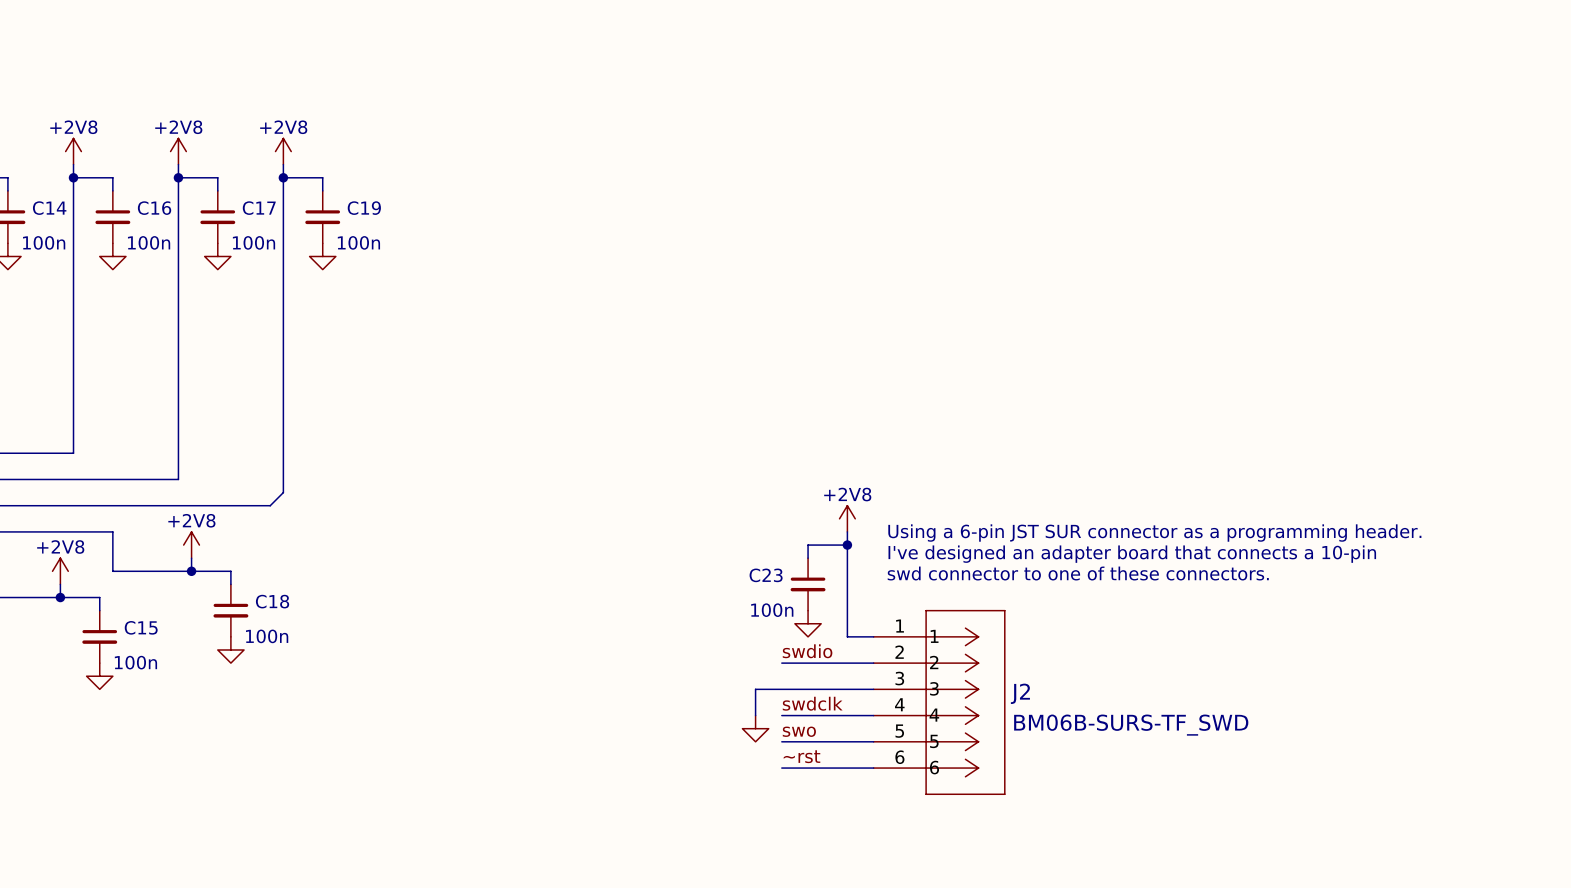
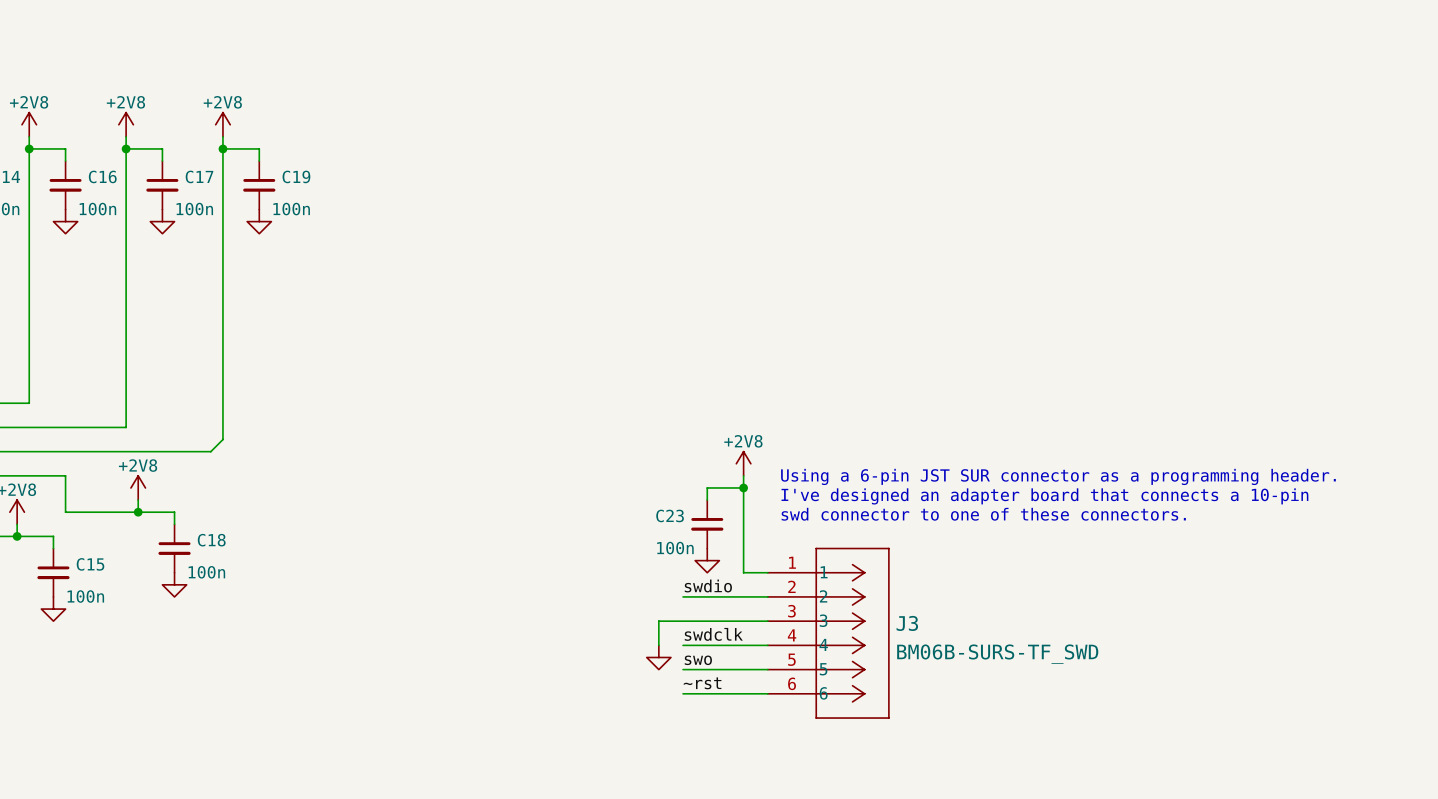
J2 name: J2 (1020, 693) -> J3 (907, 623)

